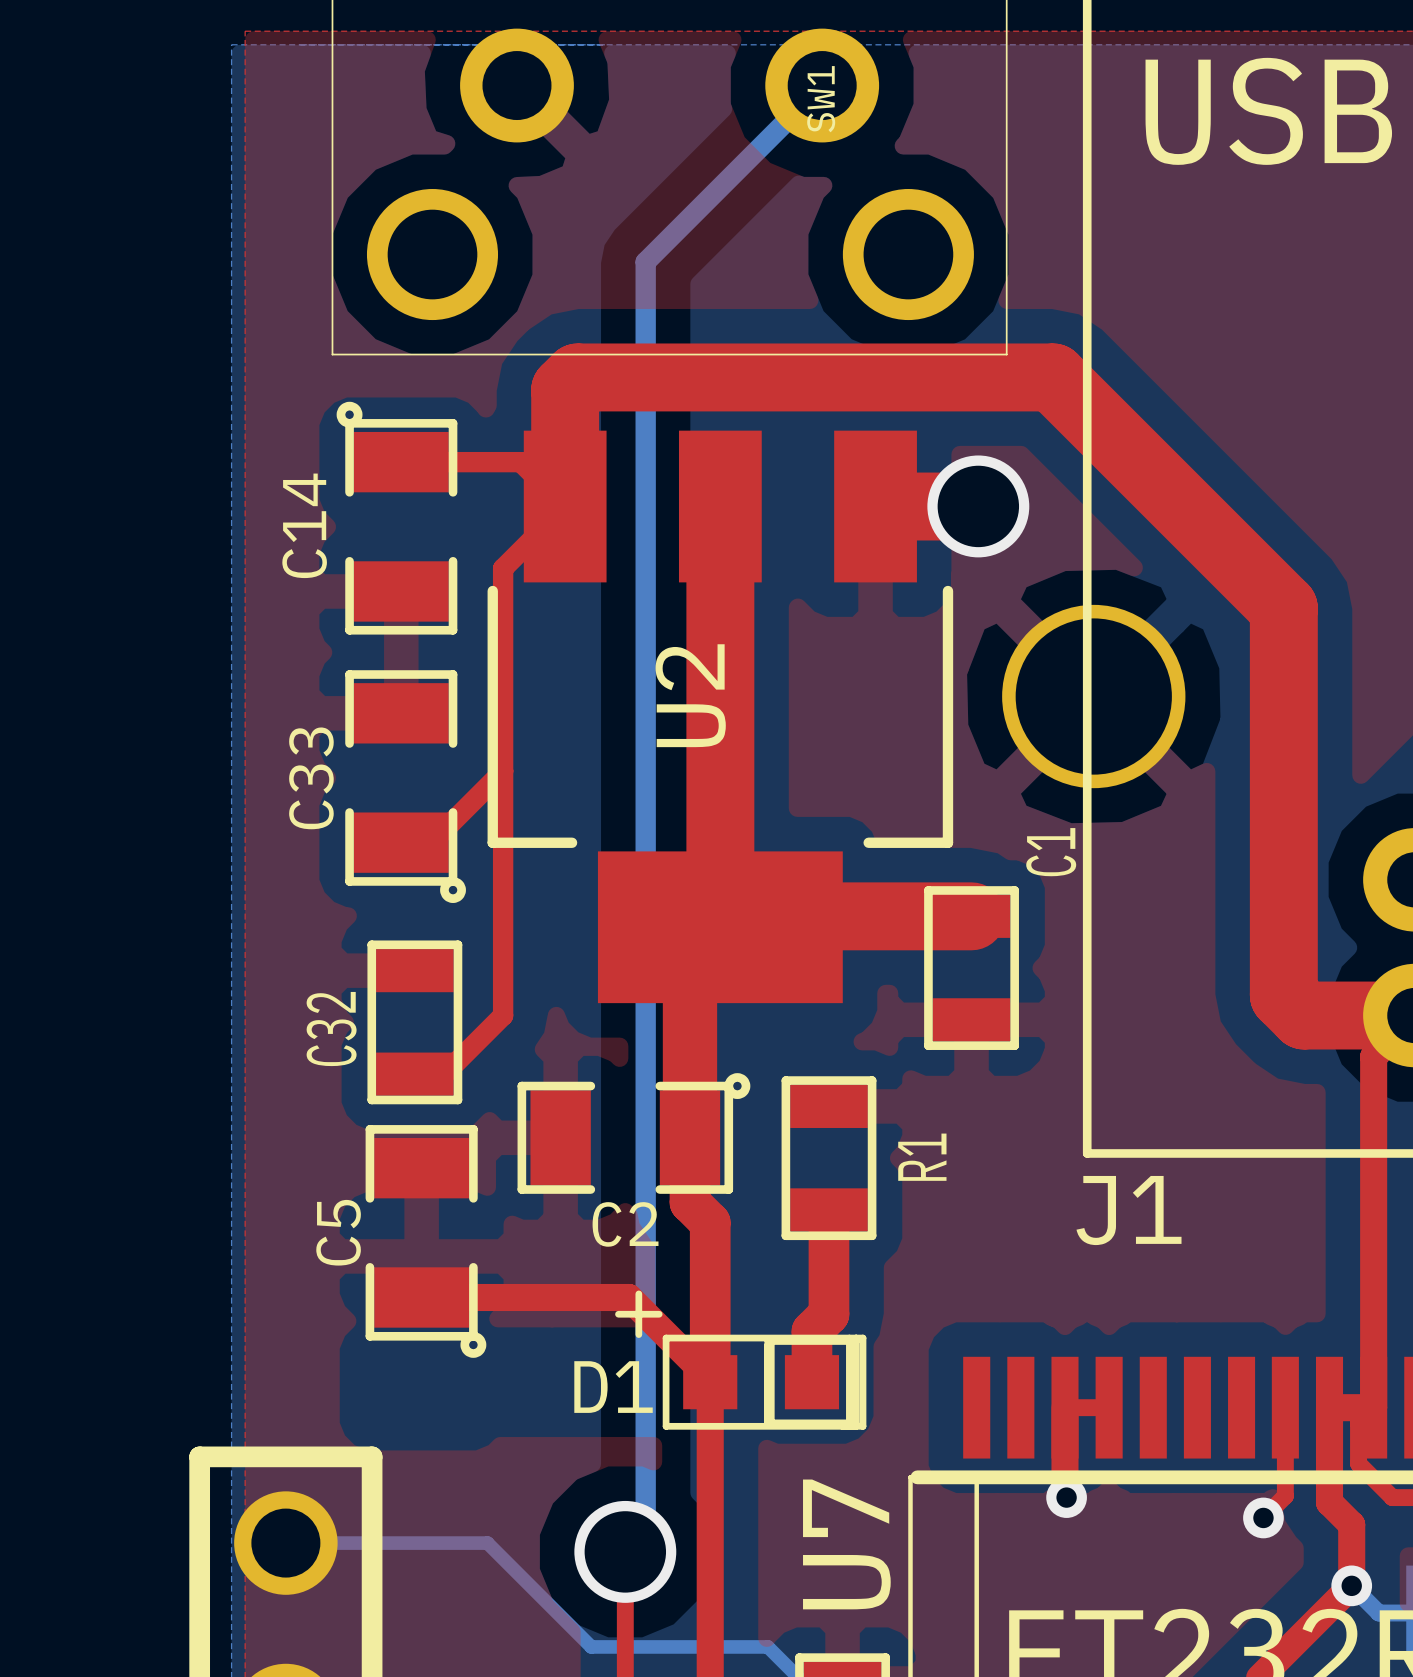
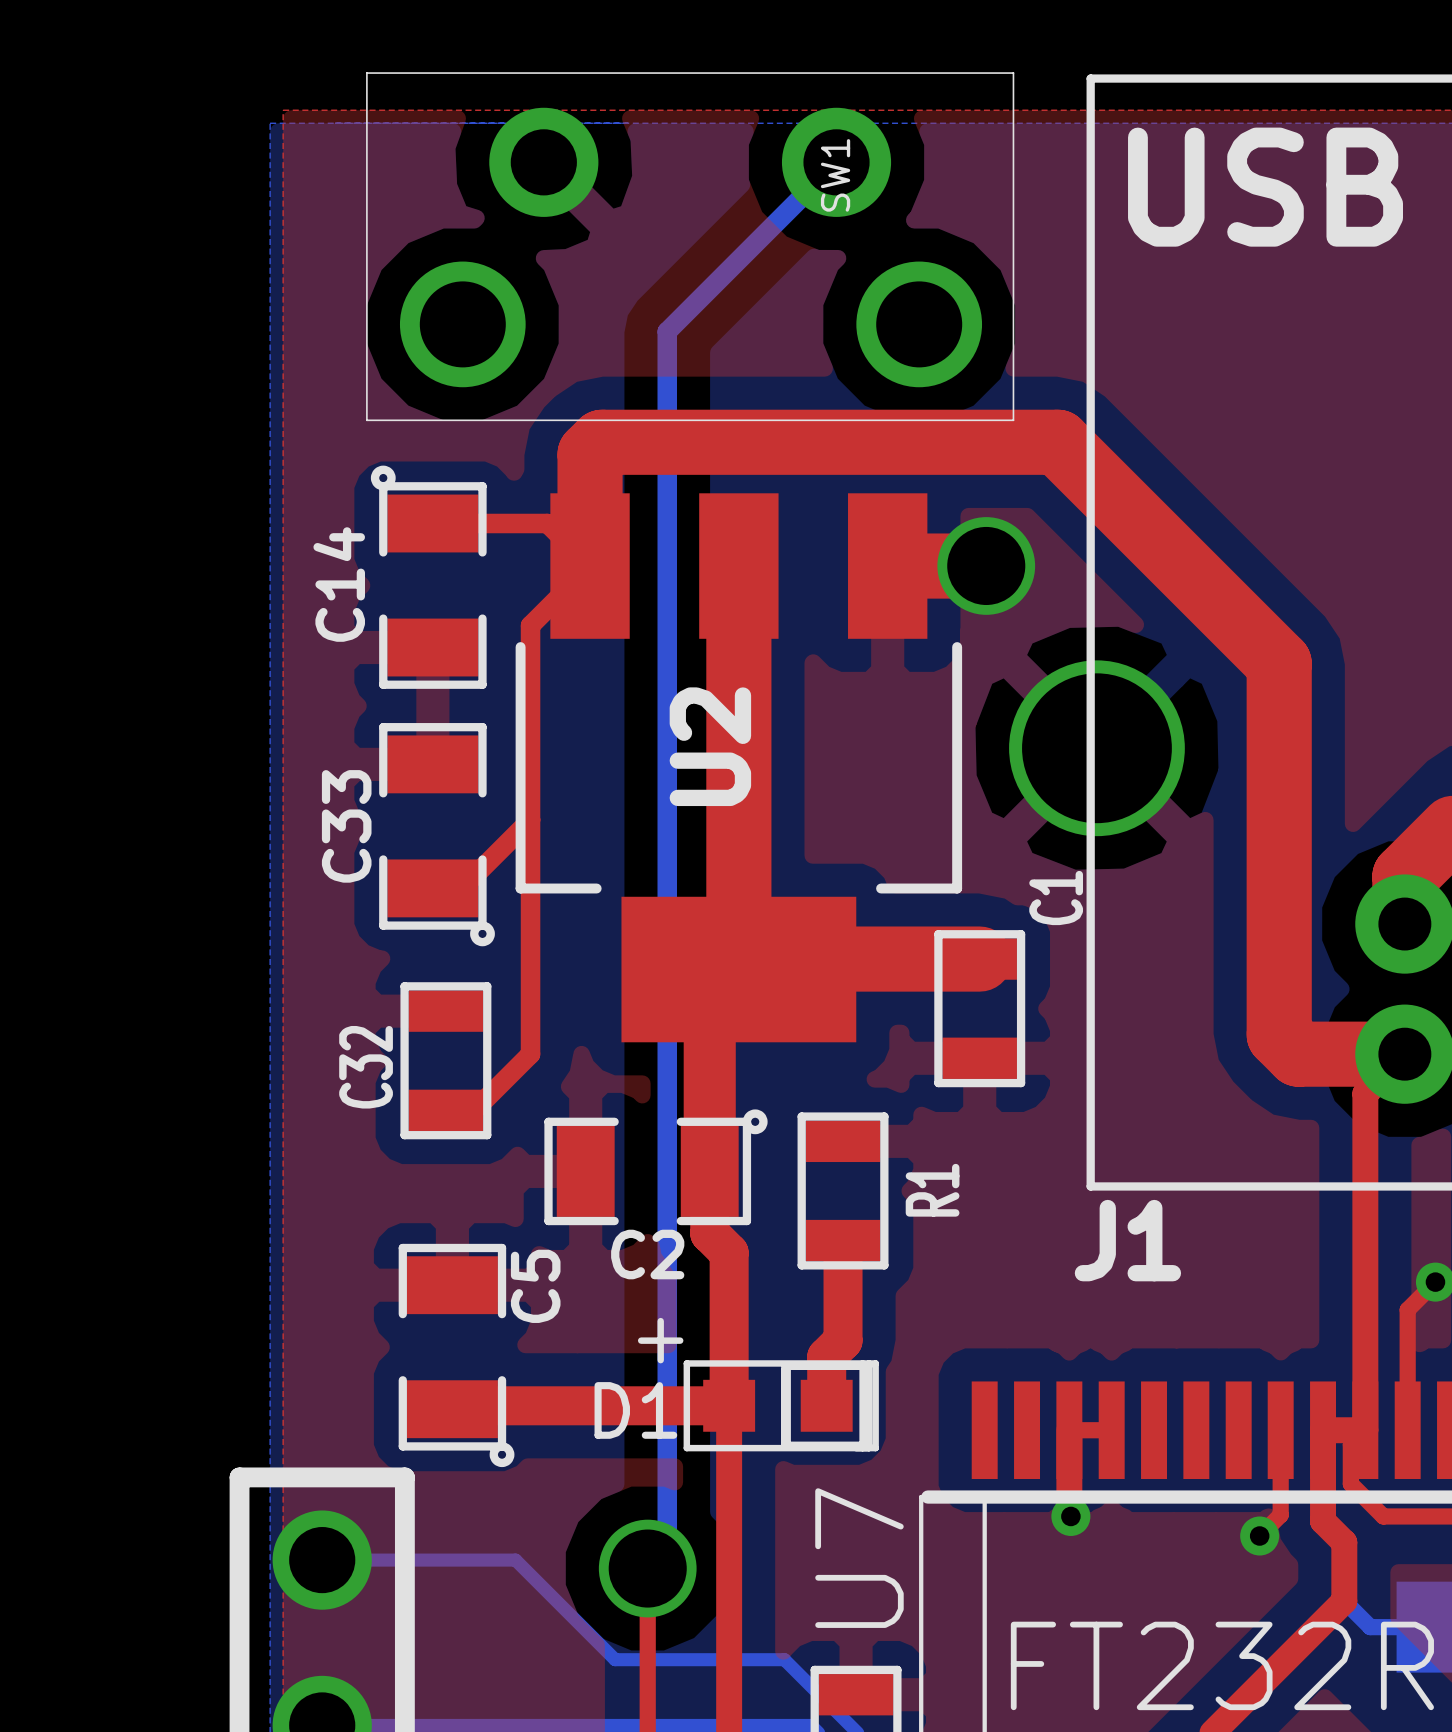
C5 name position: C5 (338, 1232) -> C5 (535, 1286)
C5 position: (425, 1241) -> (456, 1355)
top track: (421, 1297) (628, 1297) (710, 1378) (710, 1382) -> (452, 1409) (455, 1405) (729, 1405)
via: (1351, 1585) -> none

